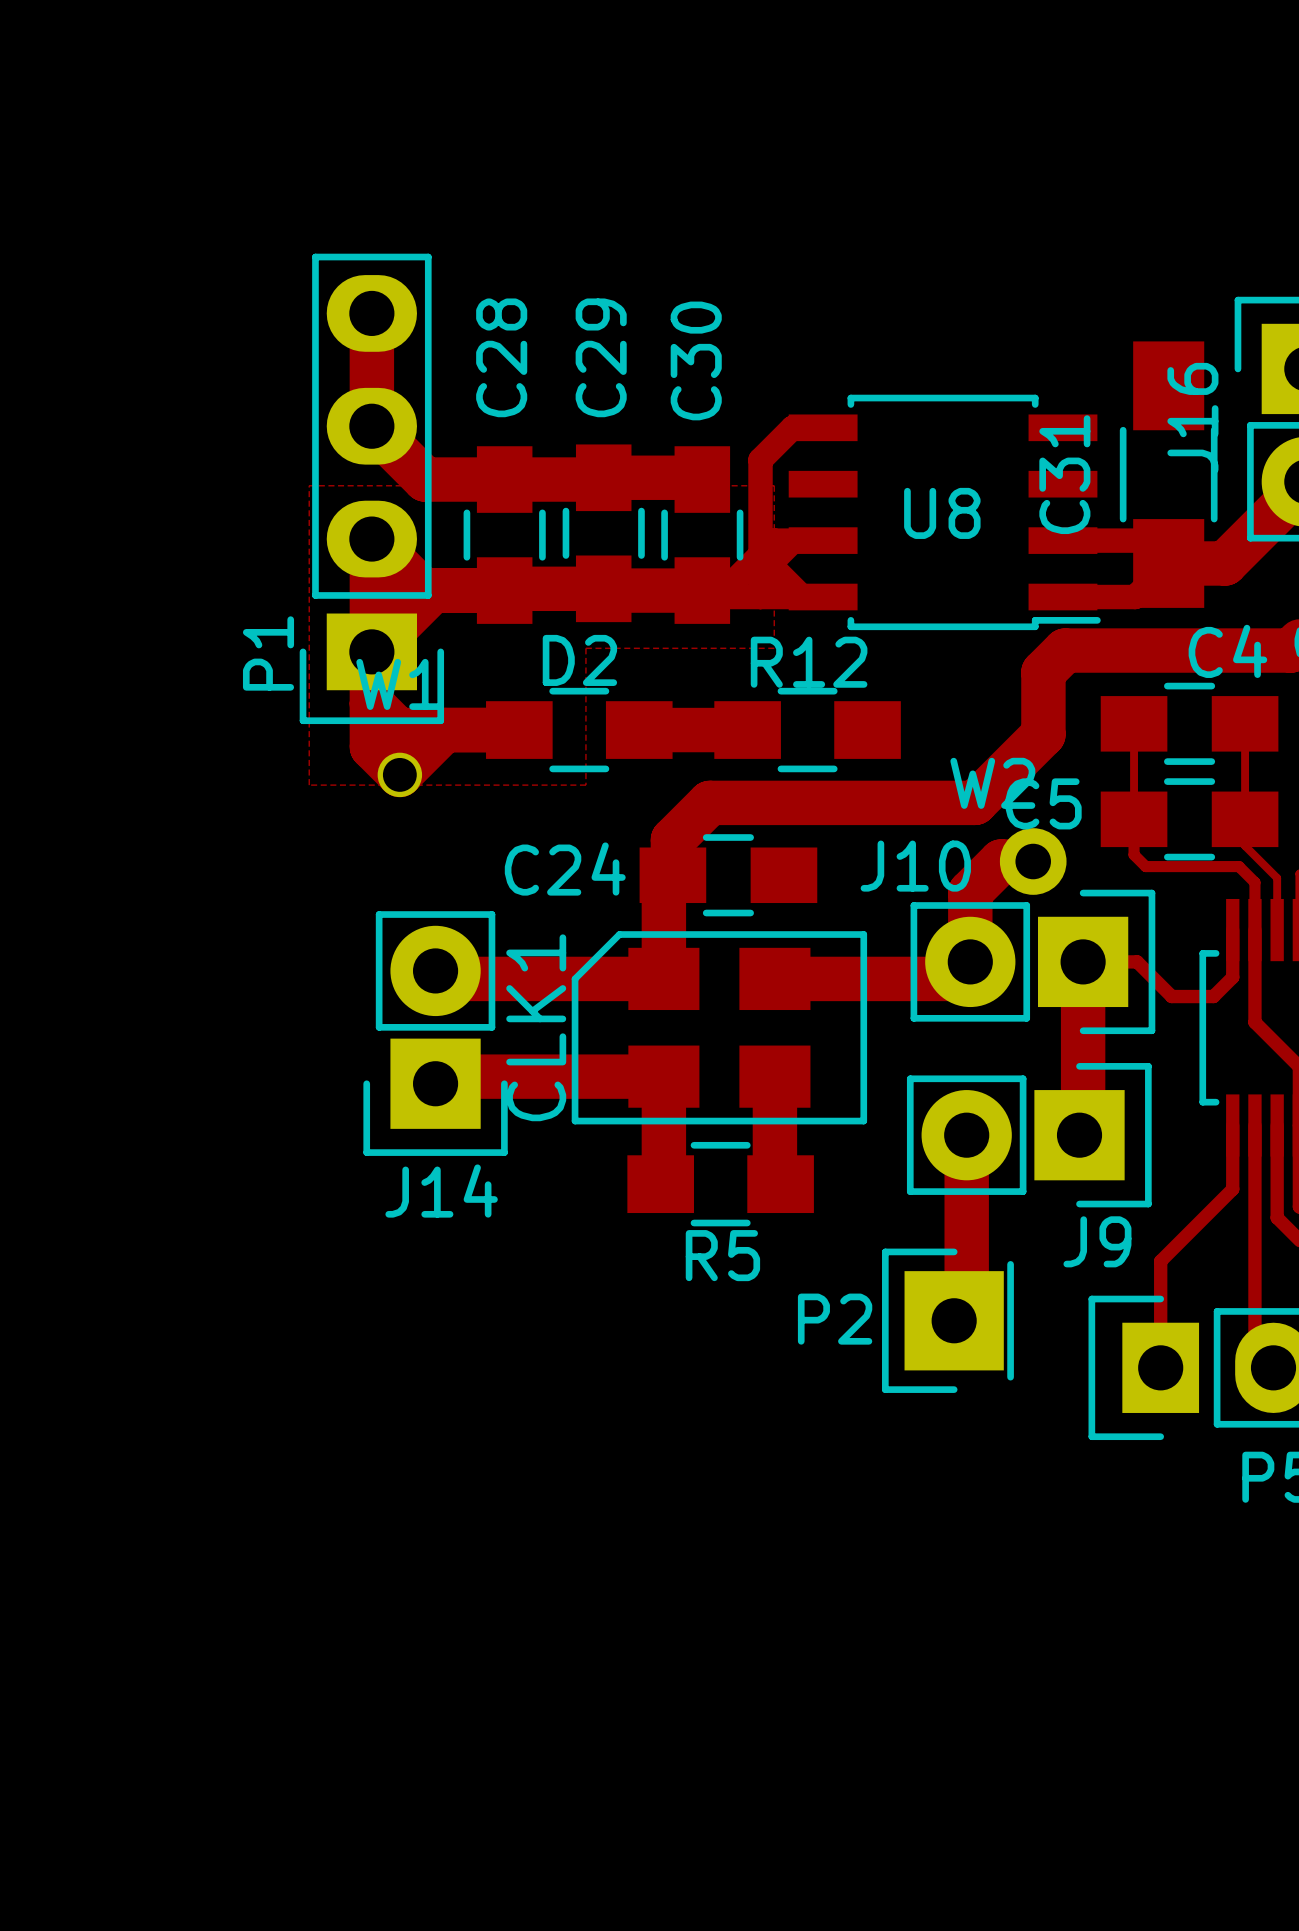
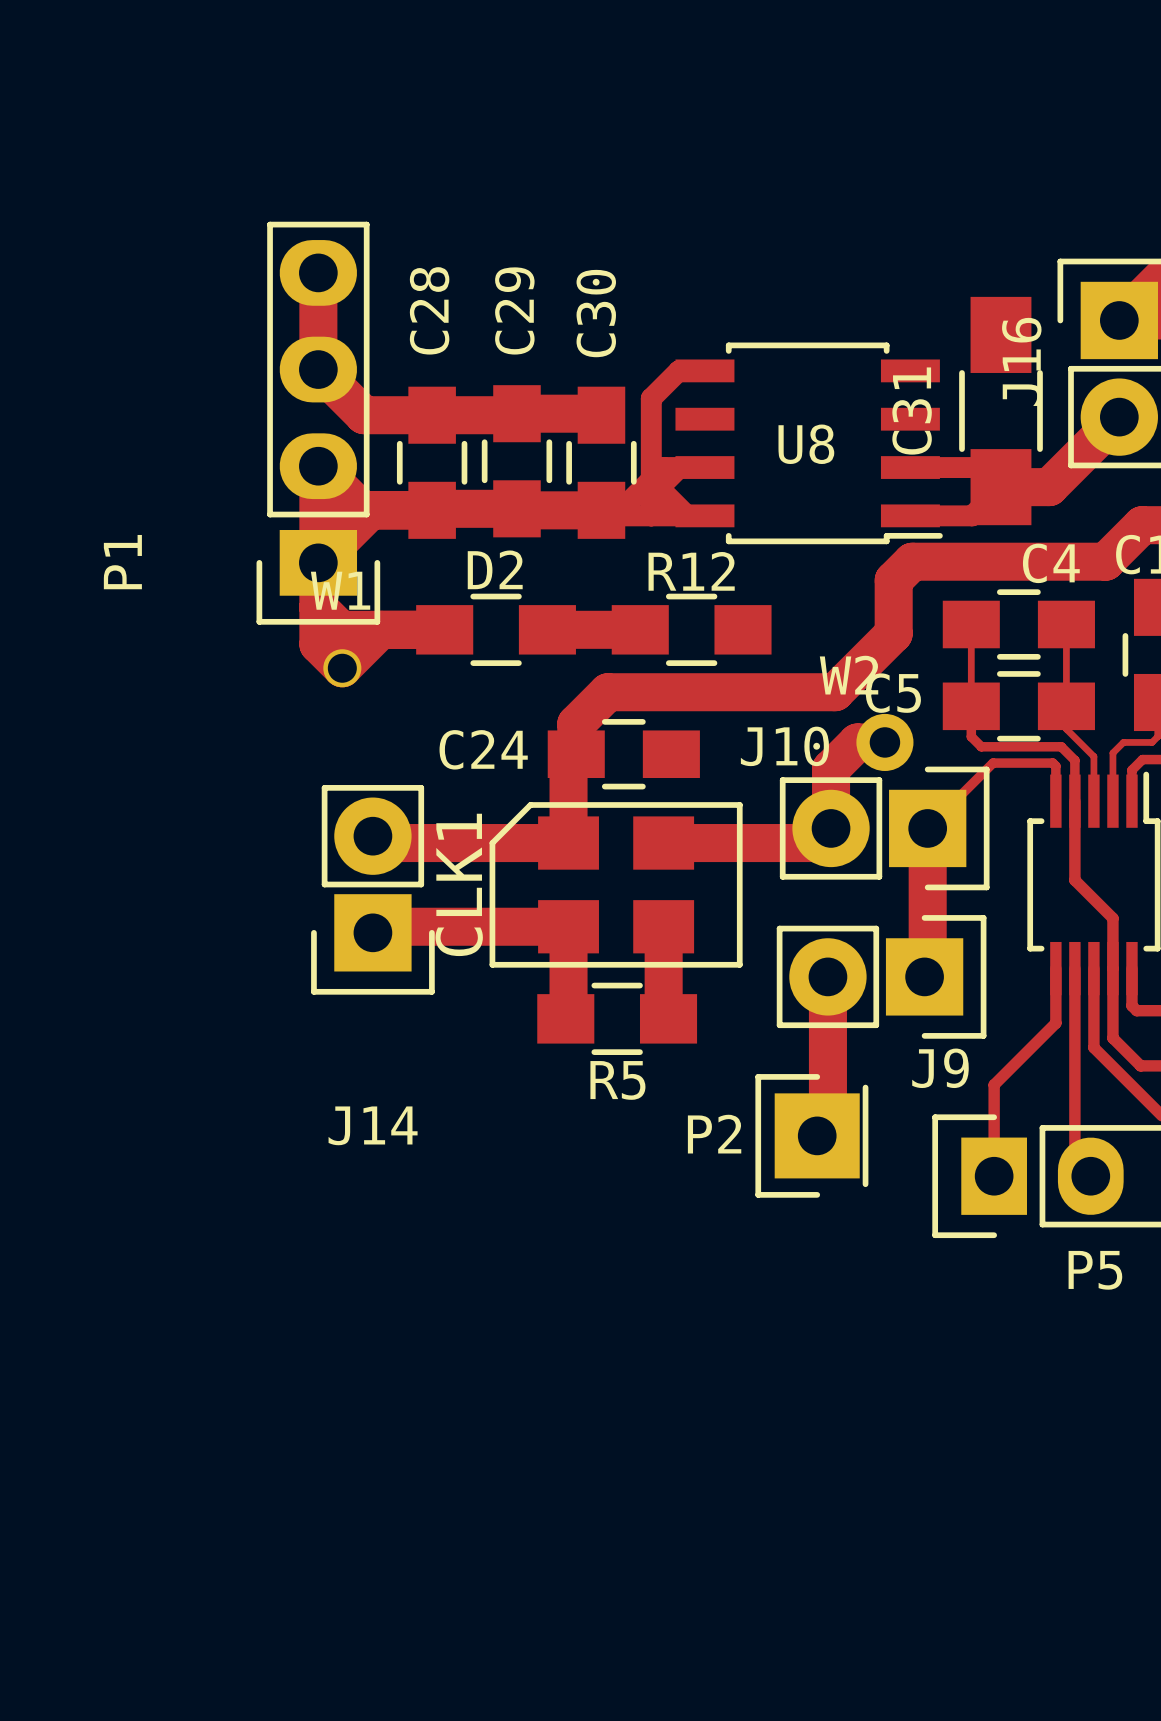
zone outline: (309, 485) (309, 785) (585, 785) (585, 648) (774, 648) (774, 485) (309, 485) -> none
P1 name position: P1 (268, 653) -> P1 (122, 562)
track: (1232, 930) (1232, 977) (1213, 996) (1171, 996) (1137, 961) (1083, 961) -> (1055, 801) (1055, 766) (1052, 763) (993, 763) (927, 828)
J14 name position: J14 (441, 1191) -> J14 (373, 1125)

